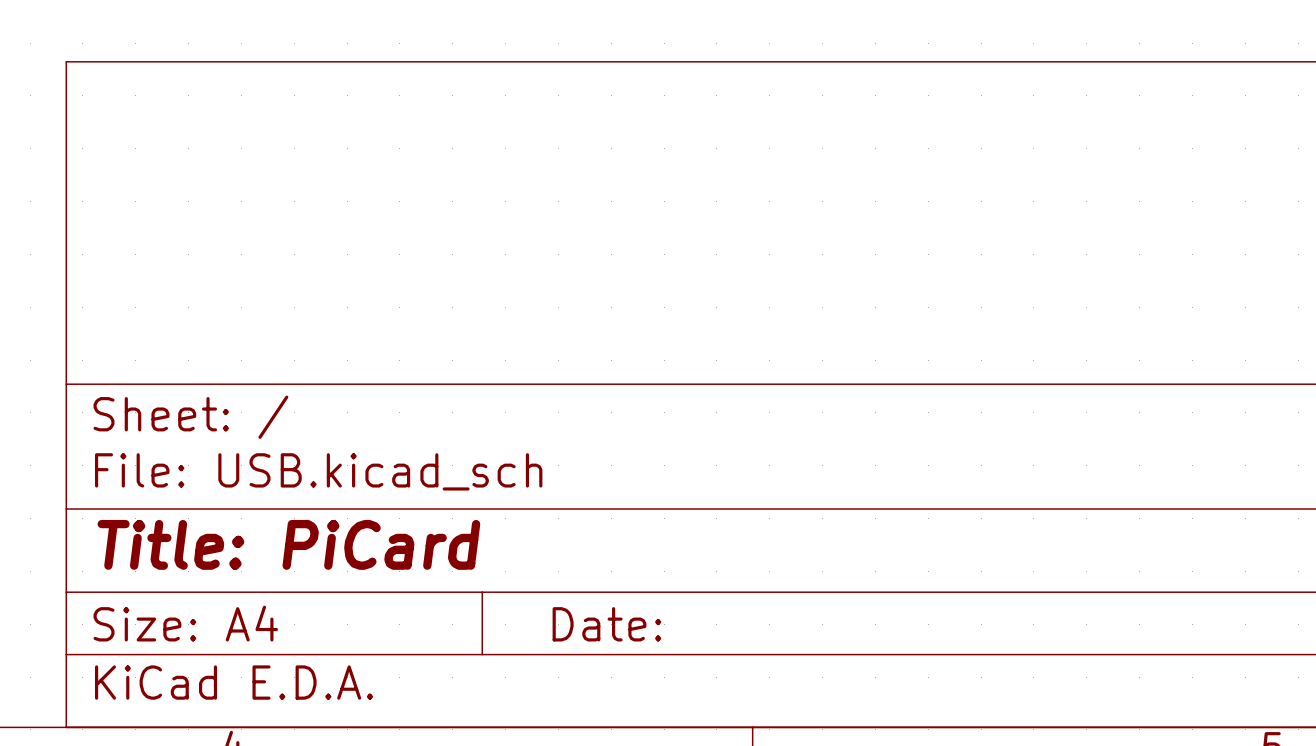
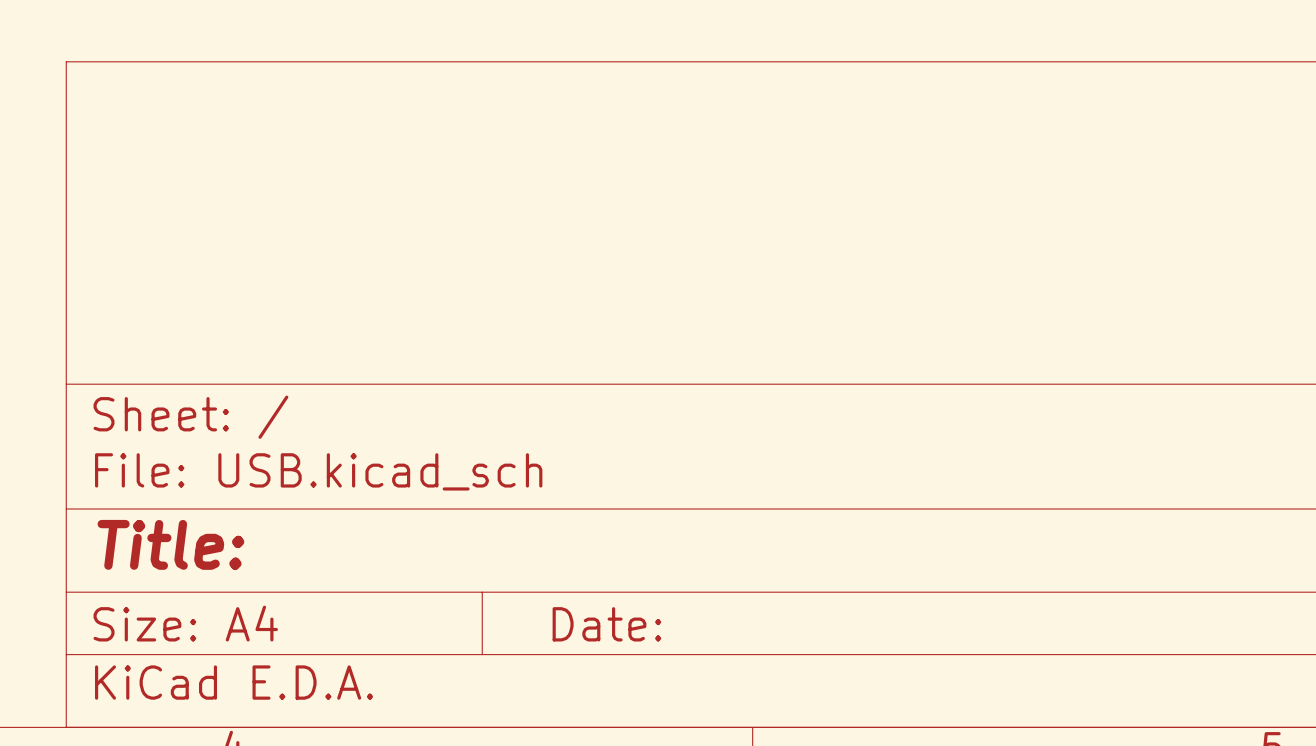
title block: Title: PiCard (288, 544) -> Title: (170, 544)

